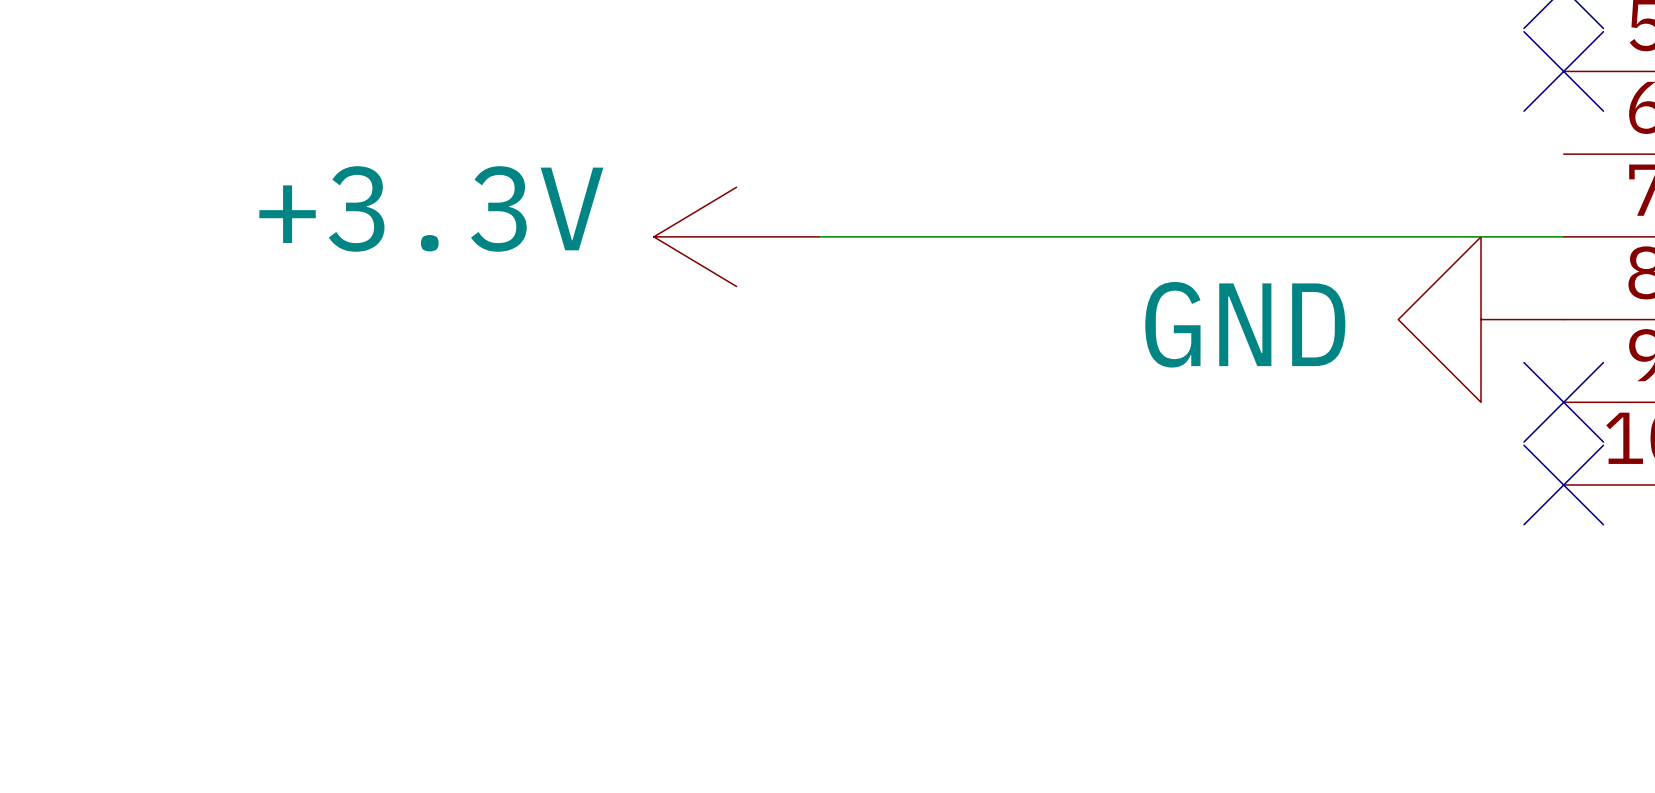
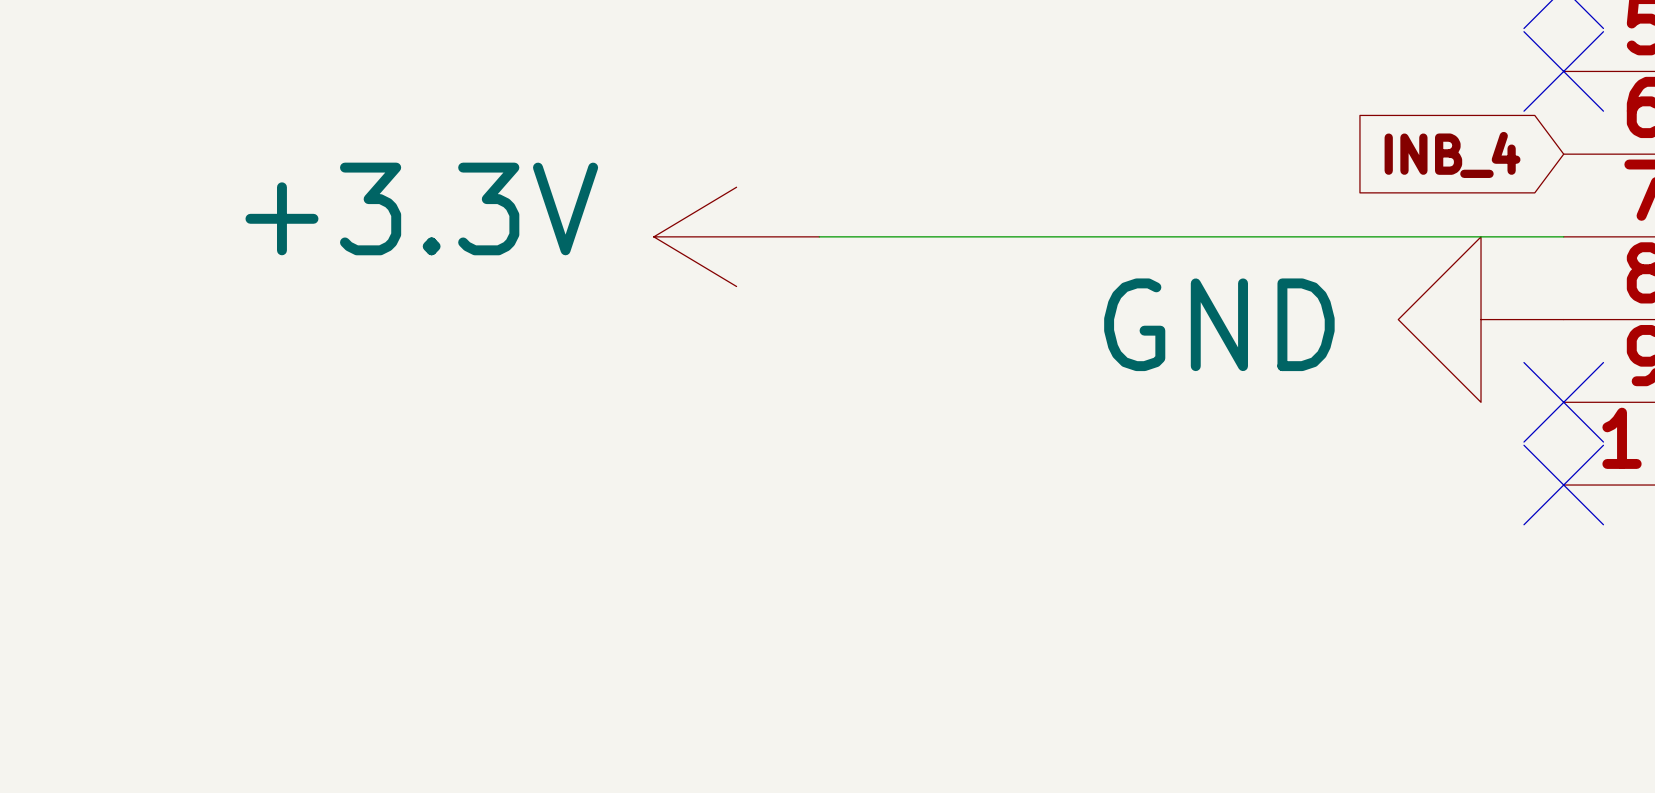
global label: none -> INB_4 (1452, 154)

